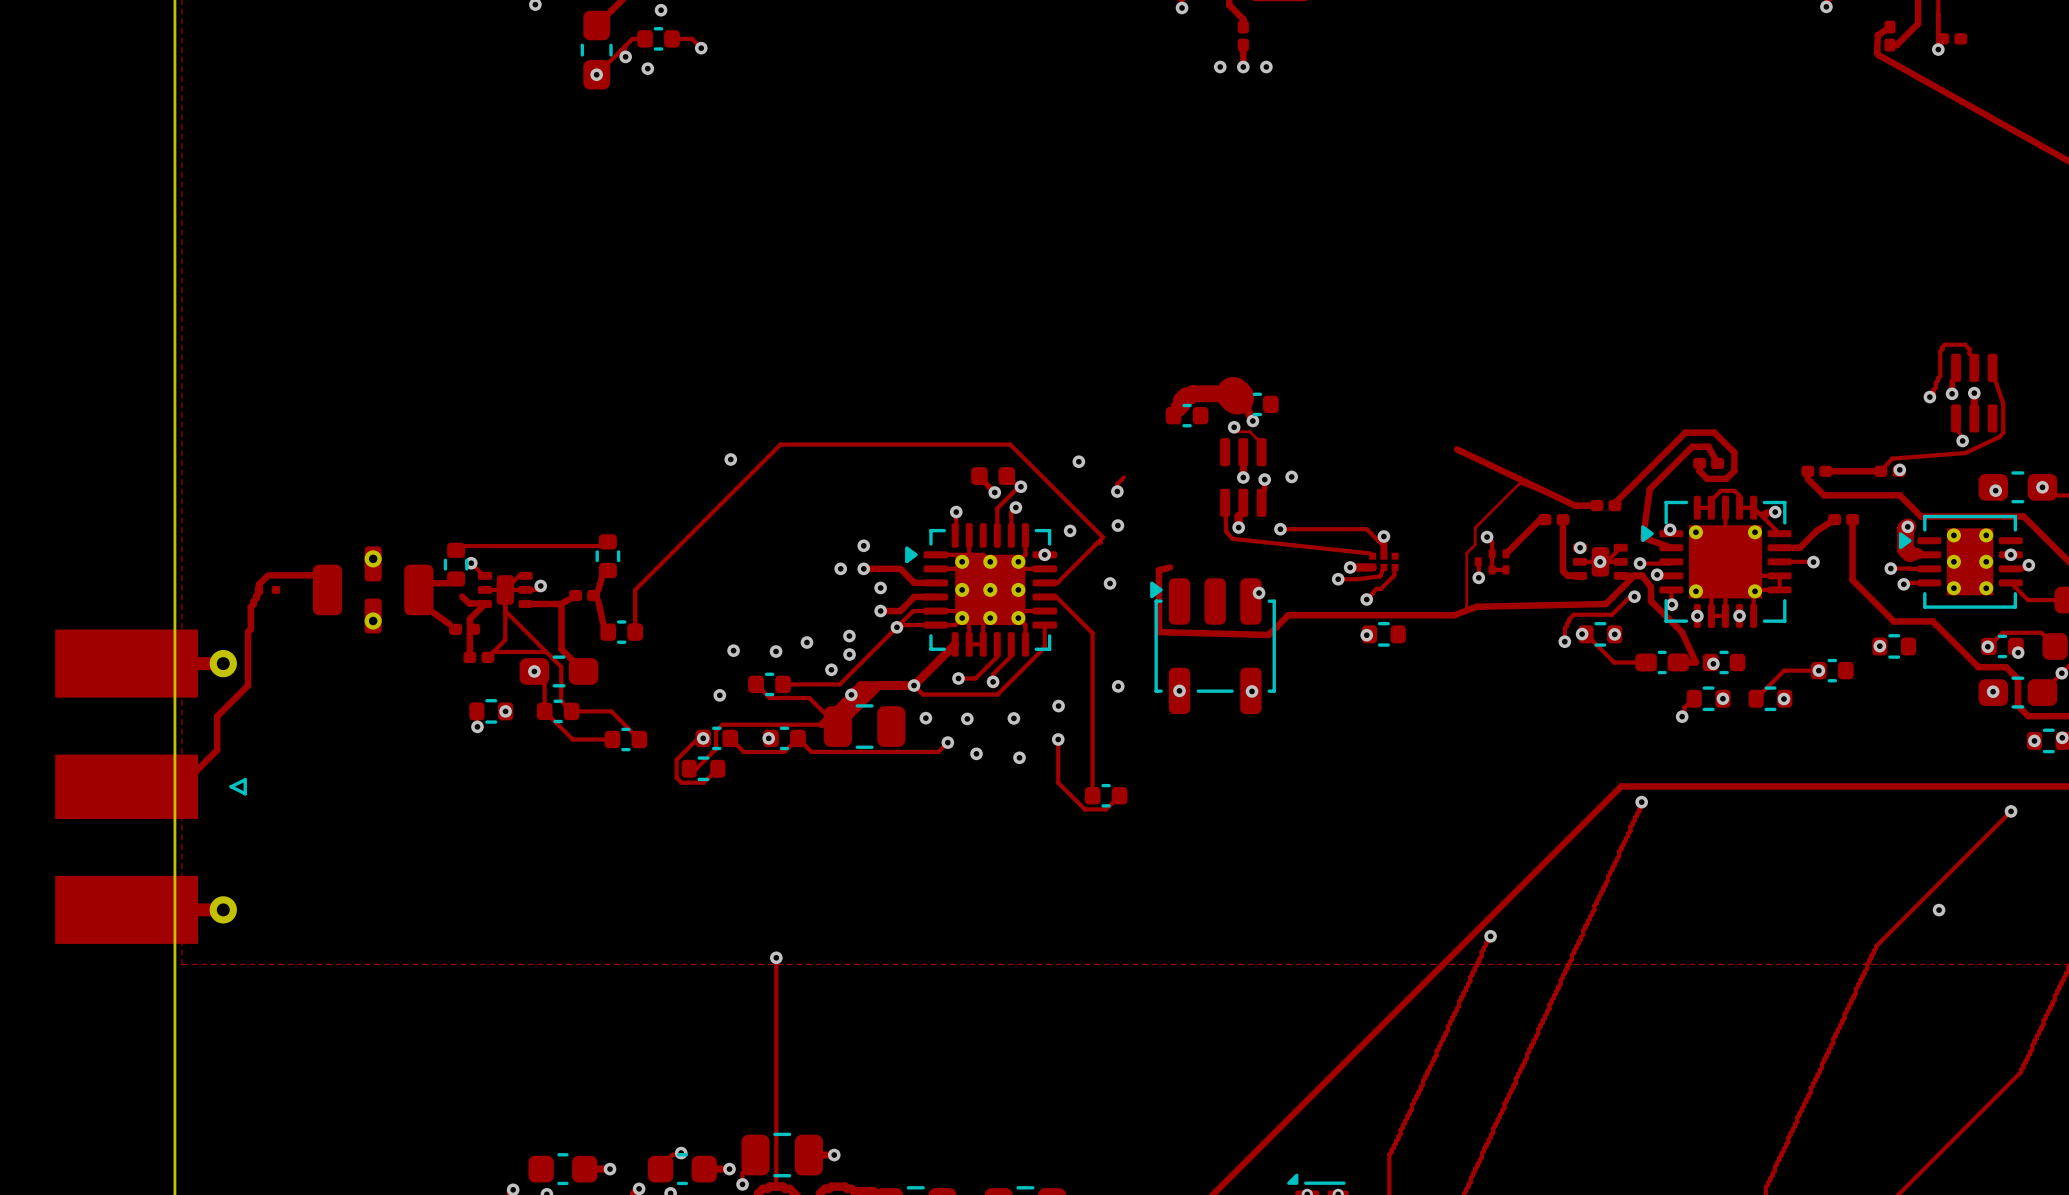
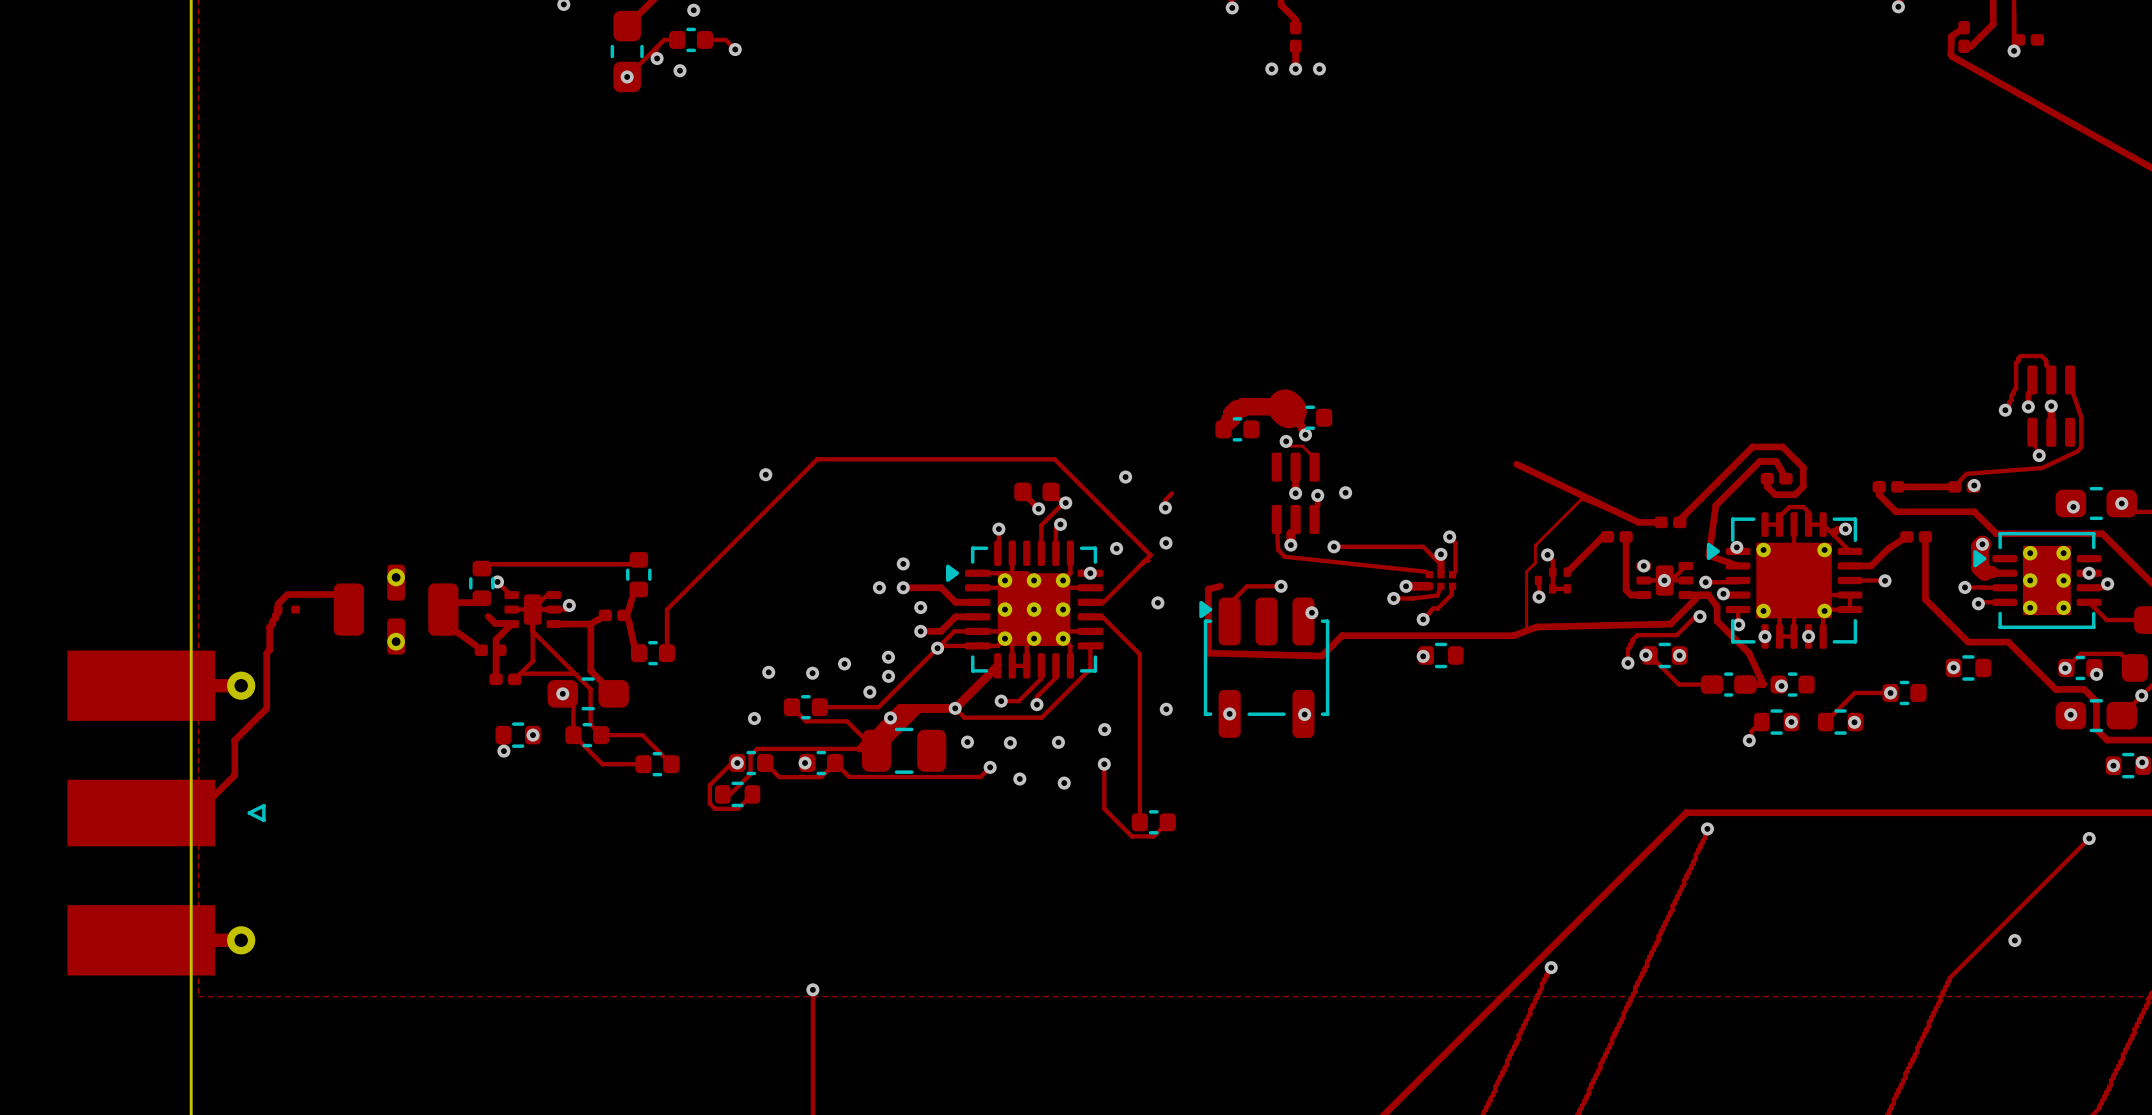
track: none -> (1449, 536) (1455, 542) (1455, 571)
via: none -> (1449, 536)
track: none -> (1281, 586) (1247, 586) (1229, 603)
via: none -> (1281, 586)

